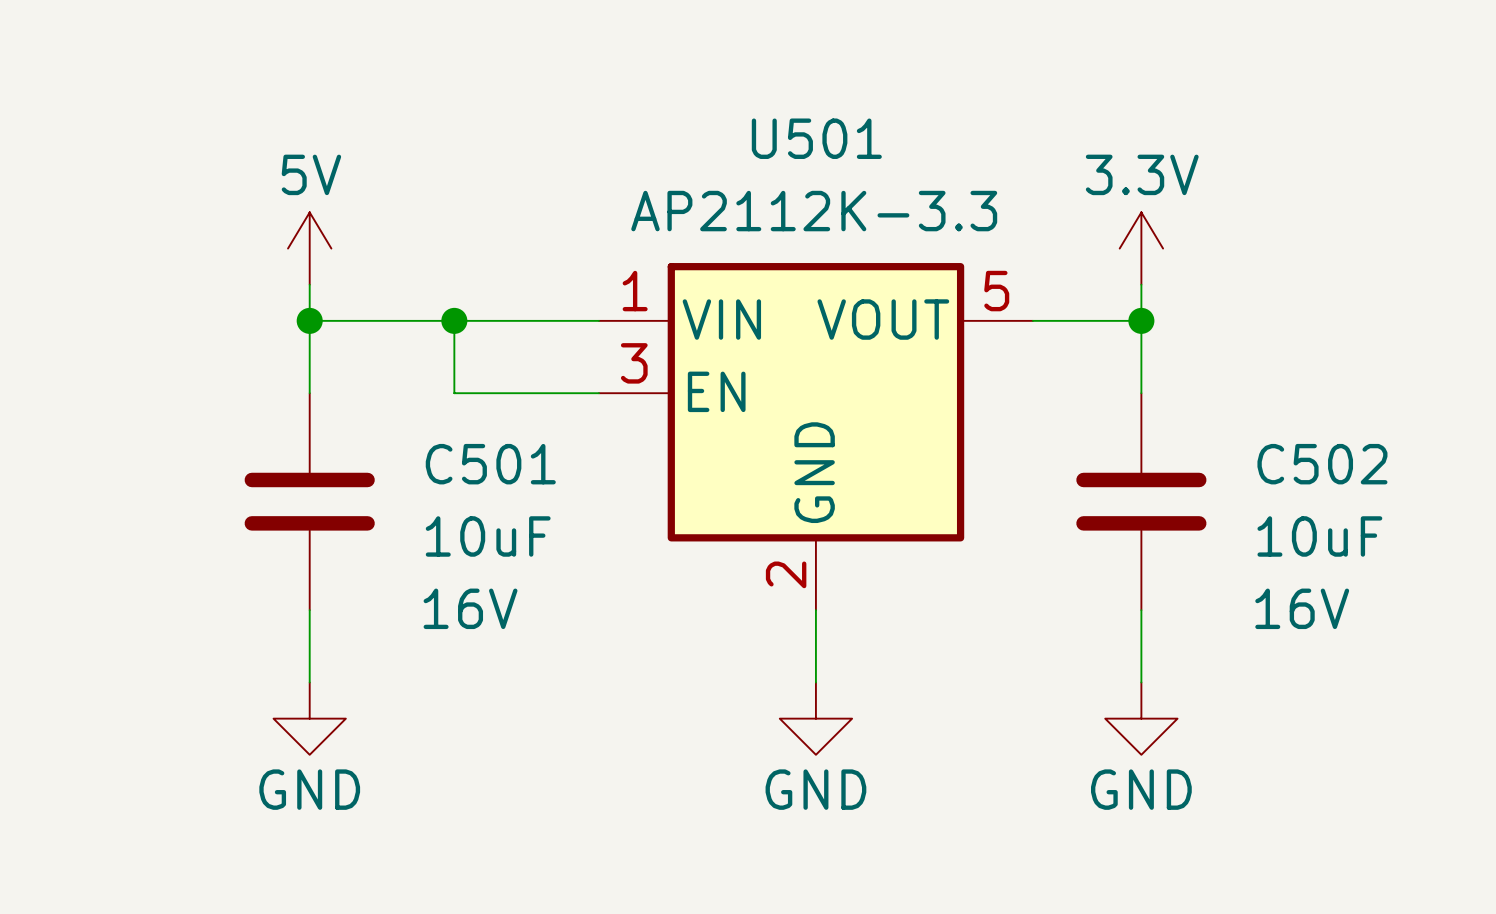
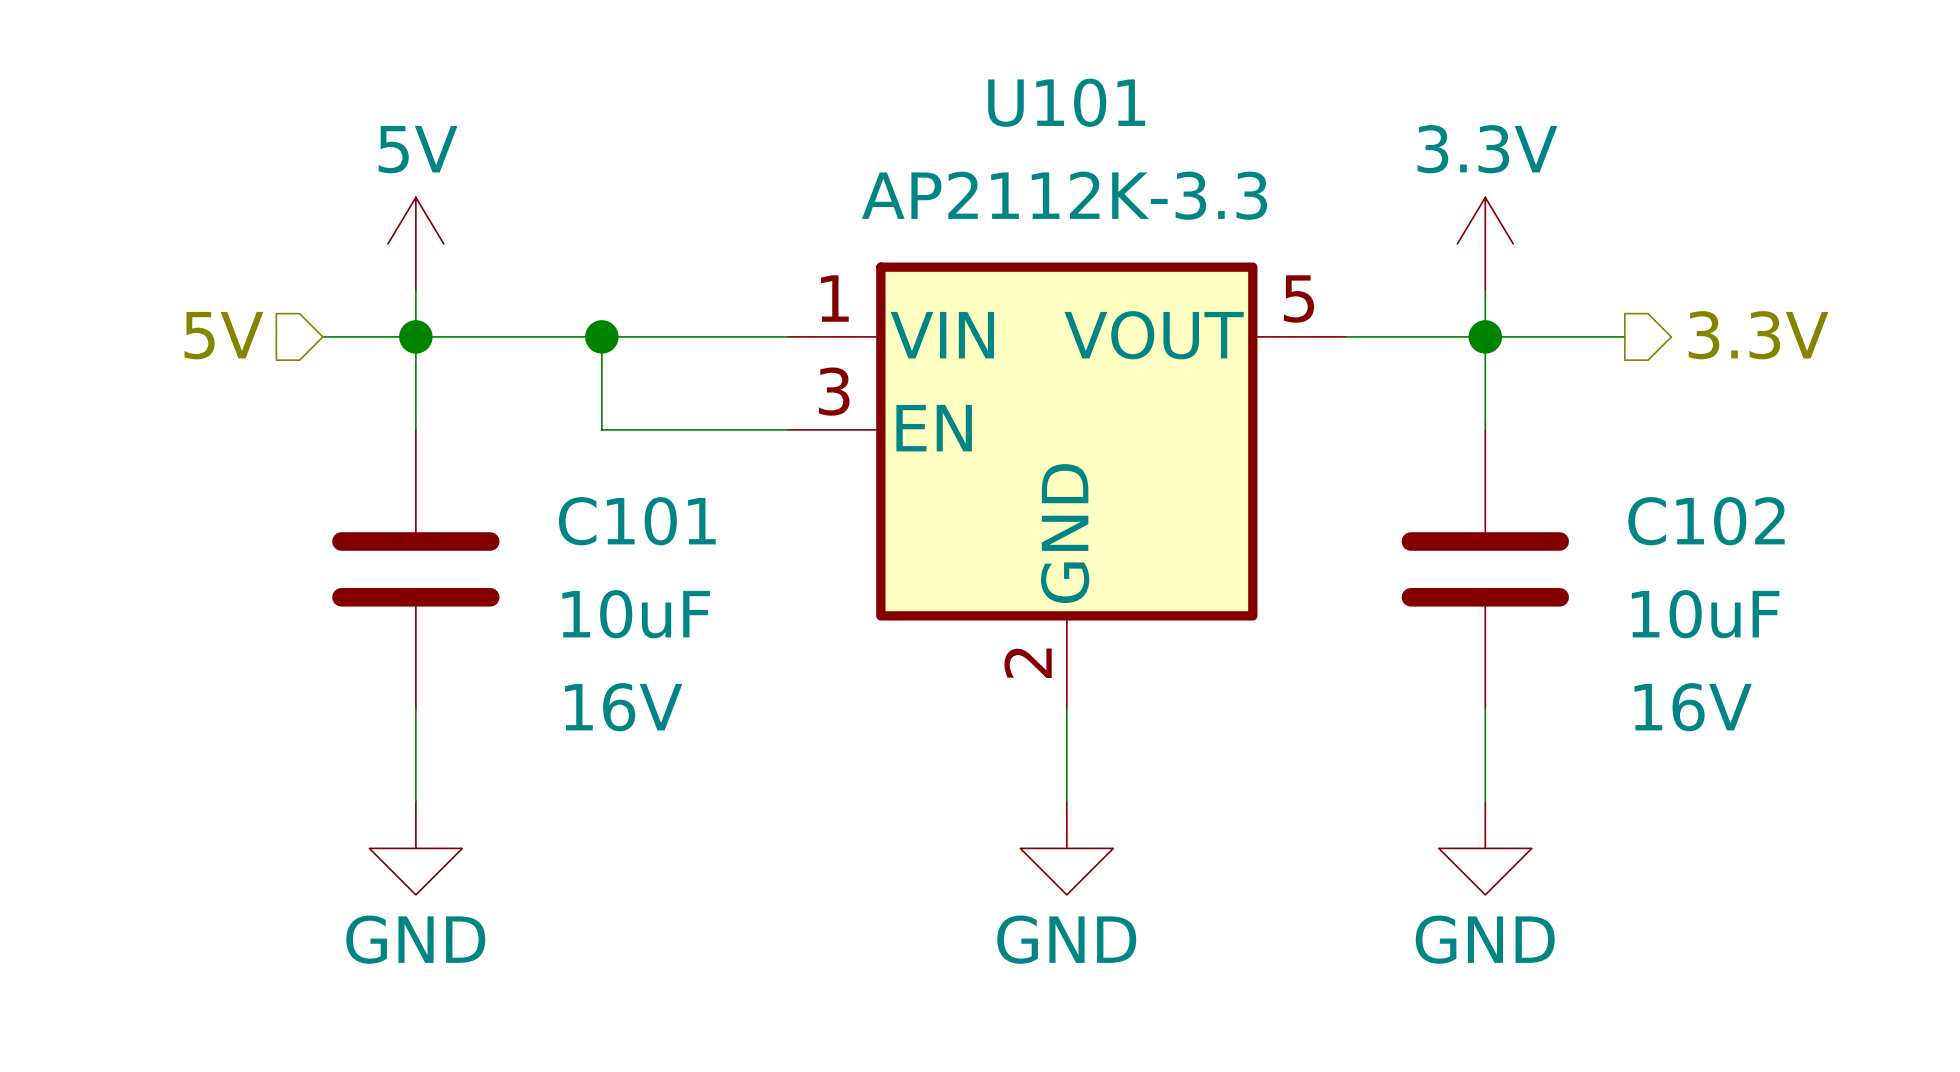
U501 name: U501 (816, 138) -> U101 (1066, 102)
hierarchical label: none -> 5V (223, 335)
hierarchical label: none -> 3.3V (1758, 335)
wire: none -> (322, 336) (415, 336)
wire: none -> (1485, 336) (1624, 336)
C501 name: C501 (490, 464) -> C101 (637, 521)
C502 name: C502 (1322, 464) -> C102 (1706, 521)

